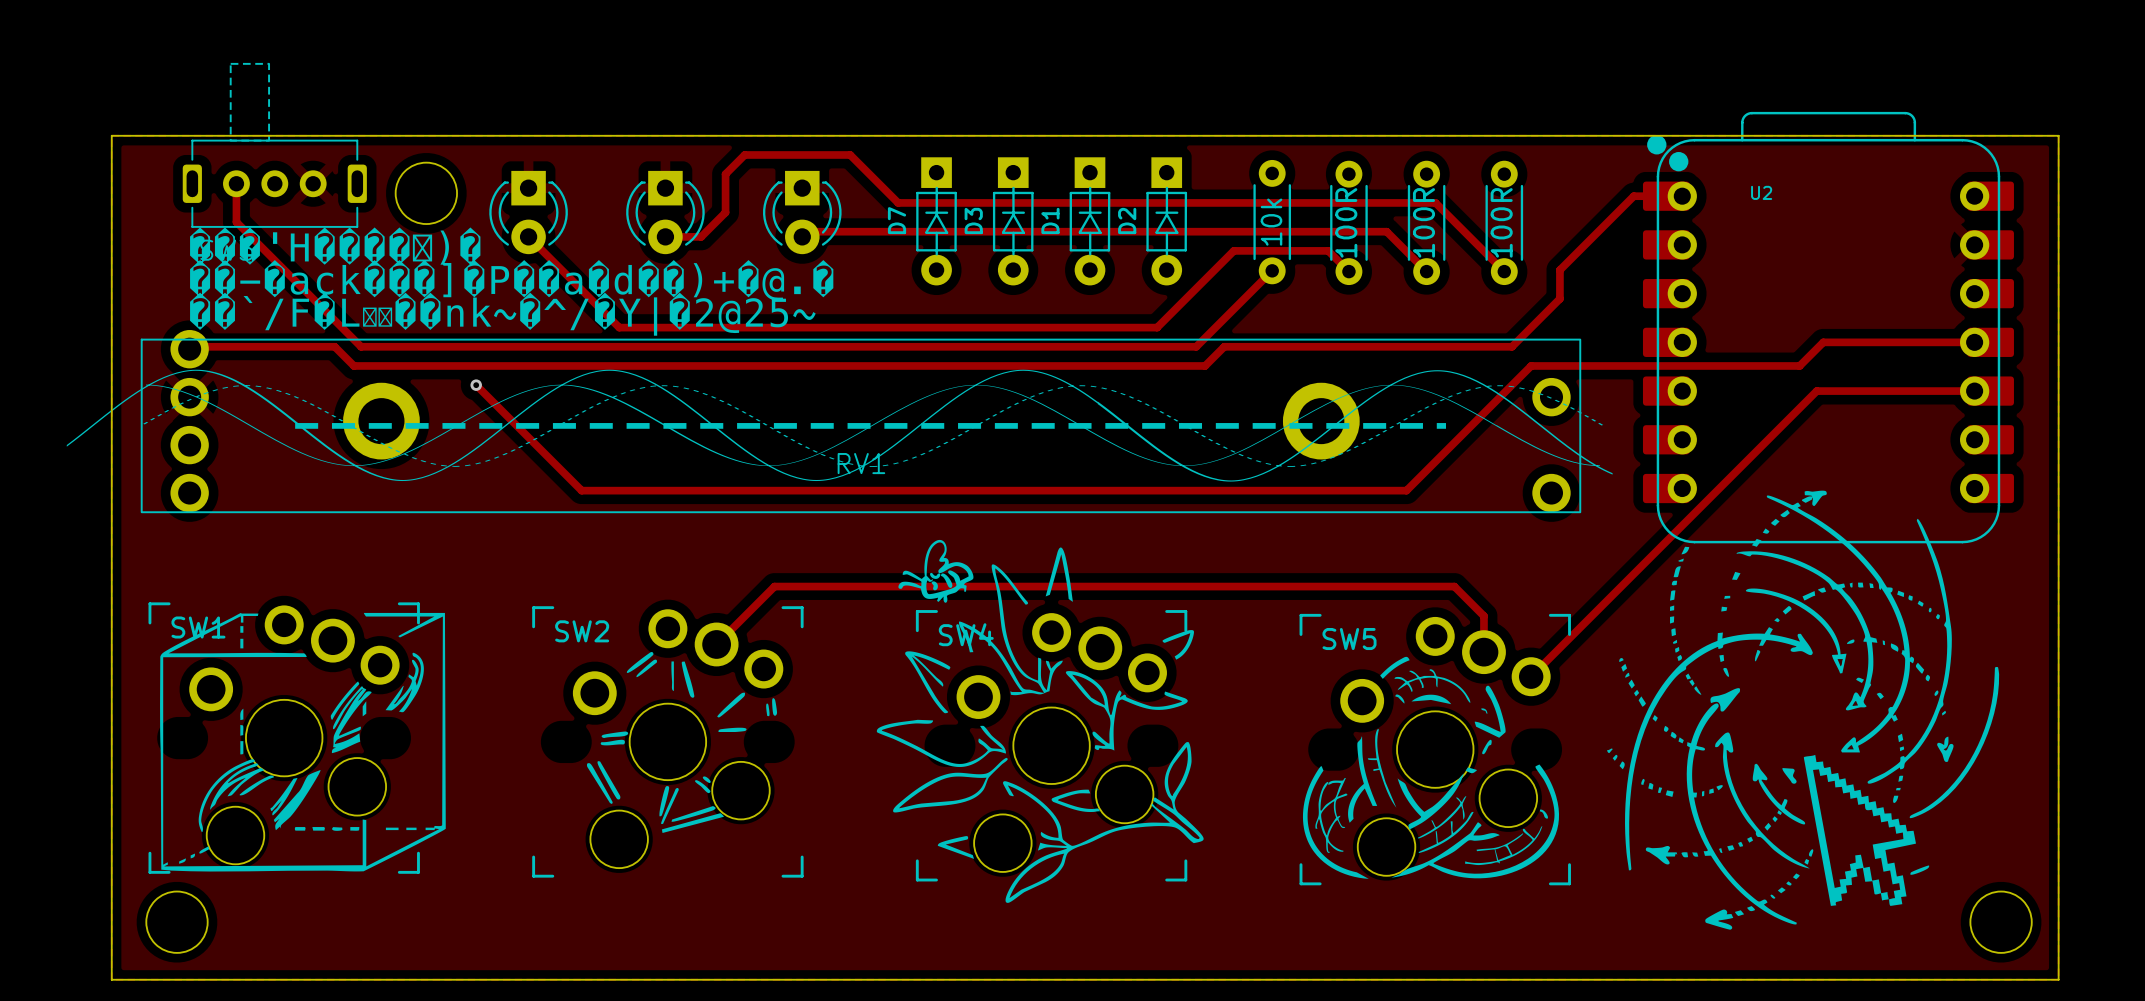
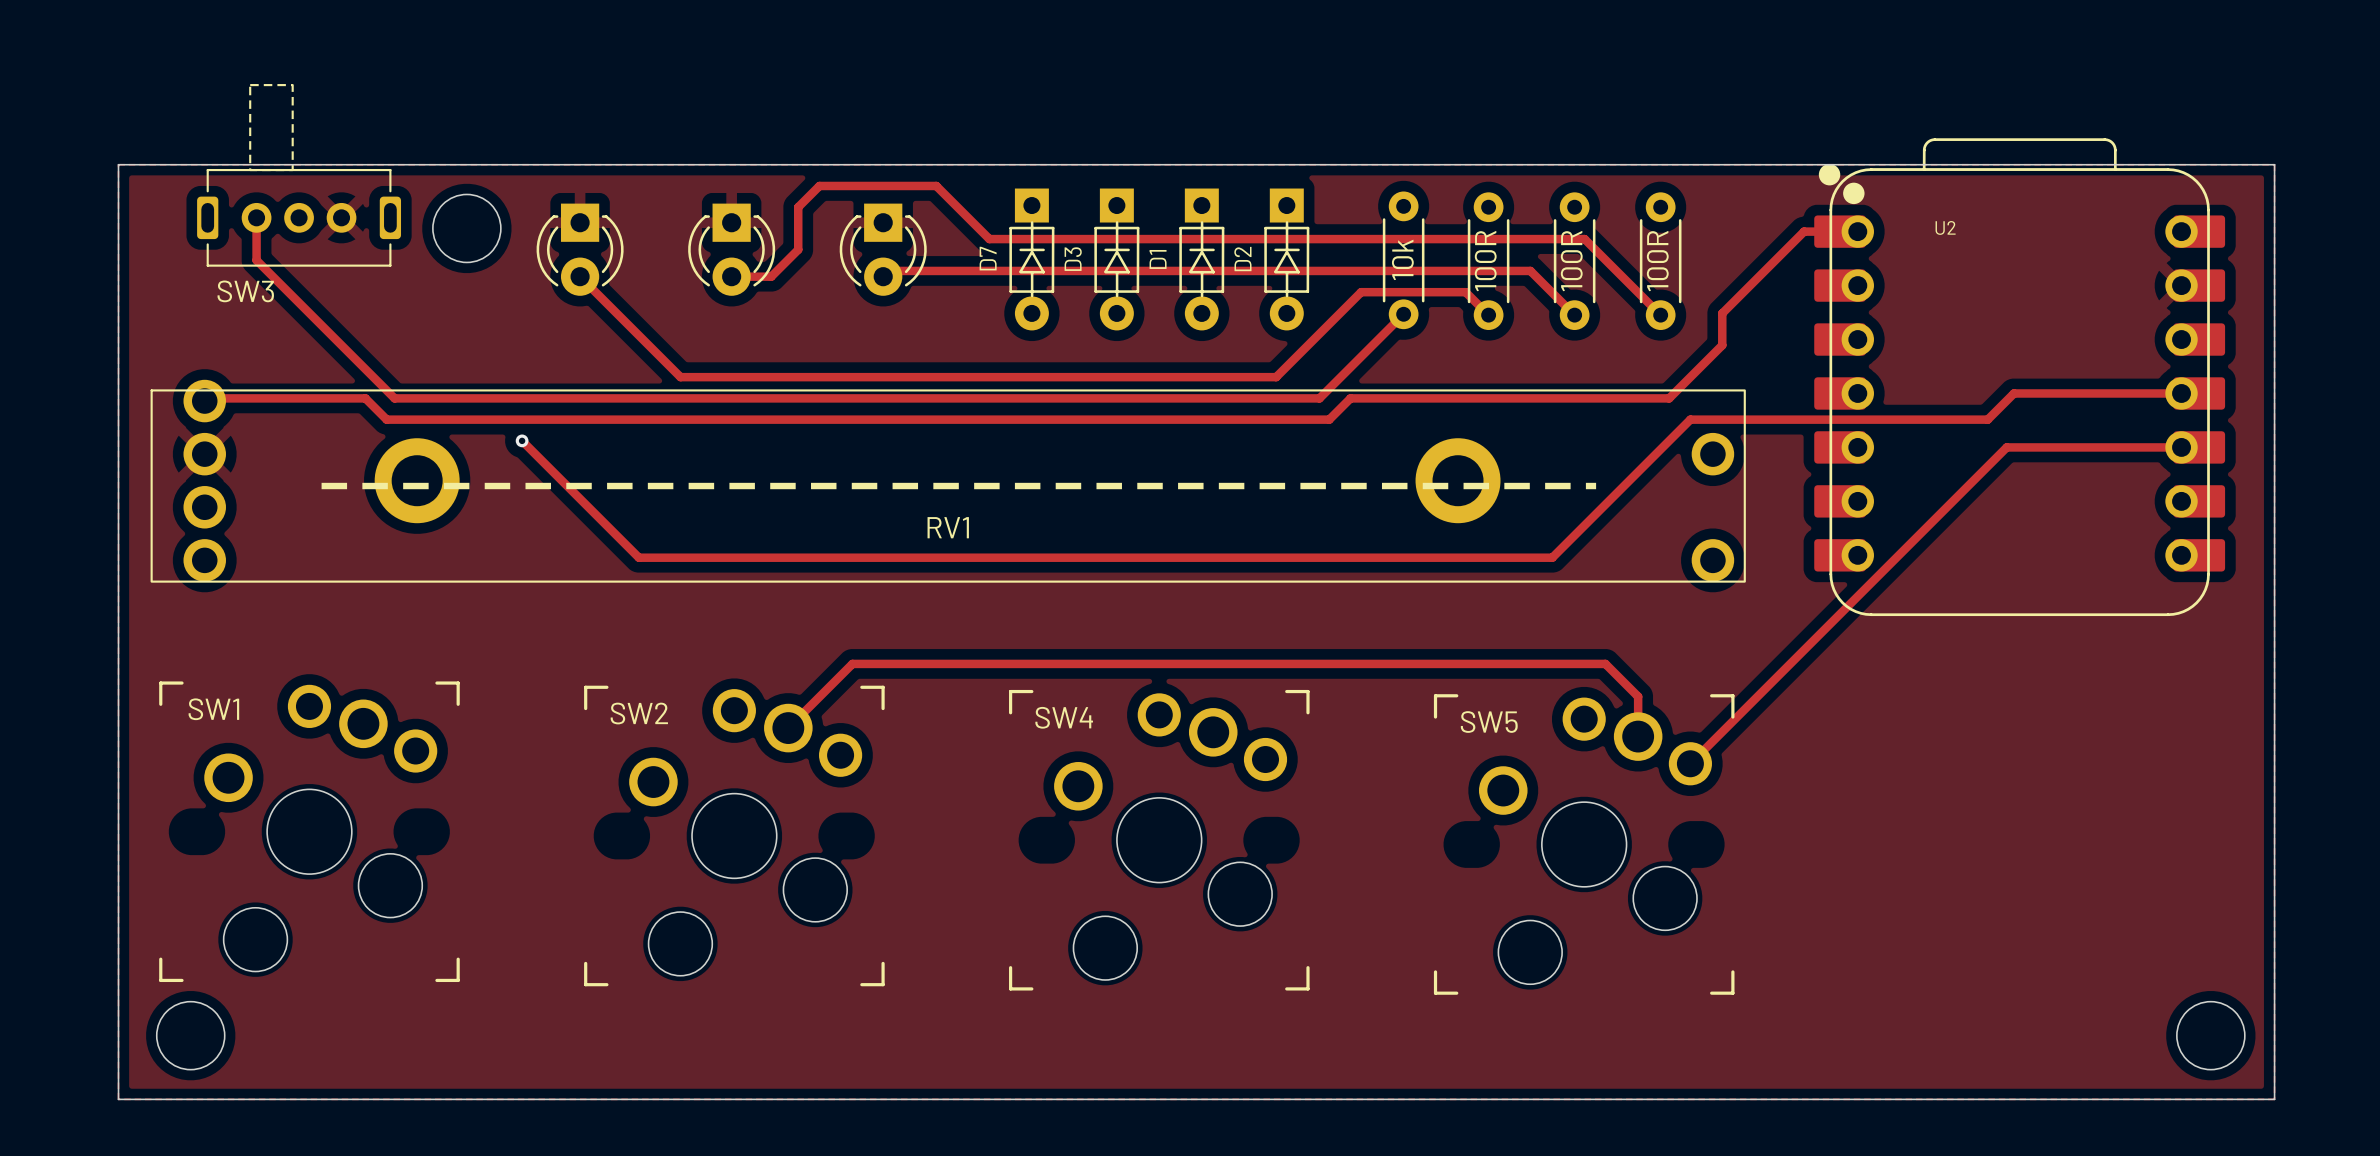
drawing: [190, 227, 834, 336] -> none
drawing: [66, 369, 1613, 482] -> none
drawing: [1607, 490, 2000, 930] -> none
drawing: [876, 539, 1204, 903] -> none
drawing: [160, 612, 446, 872] -> none
drawing: [626, 652, 778, 733] -> none
drawing: [1302, 656, 1560, 879] -> none
drawing: [586, 731, 629, 805] -> none
drawing: [659, 776, 724, 834] -> none
drawing: [937, 836, 975, 859] -> none

